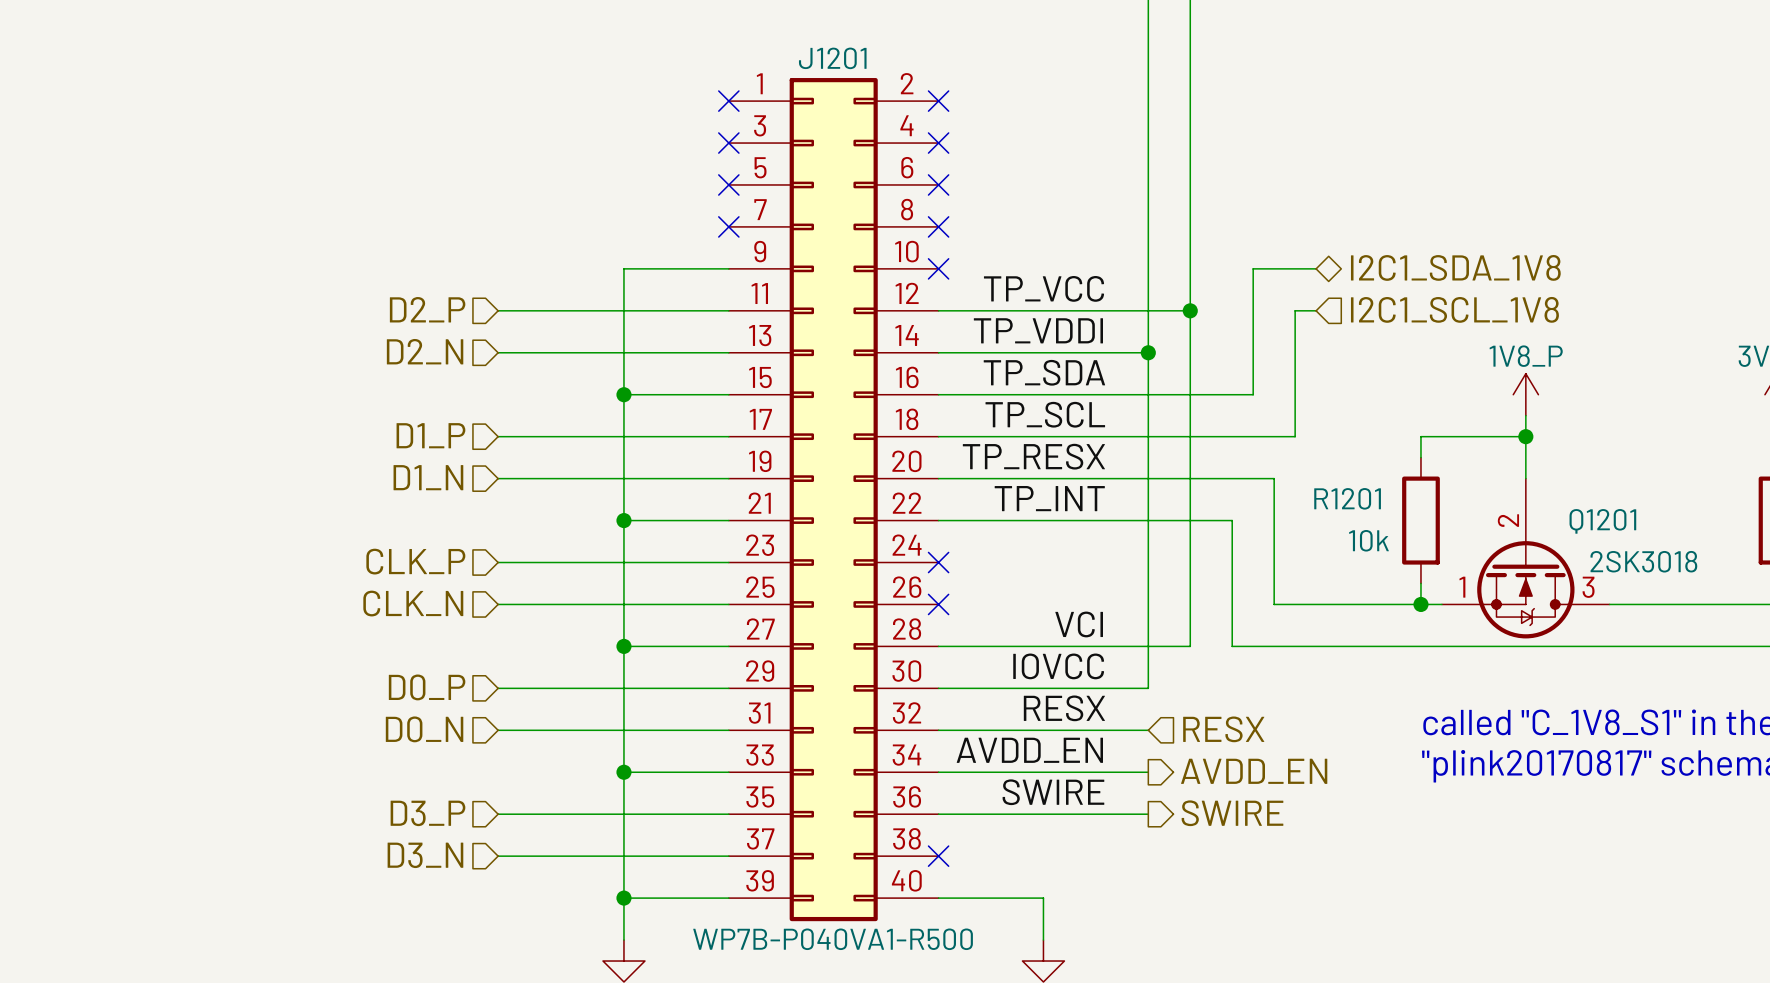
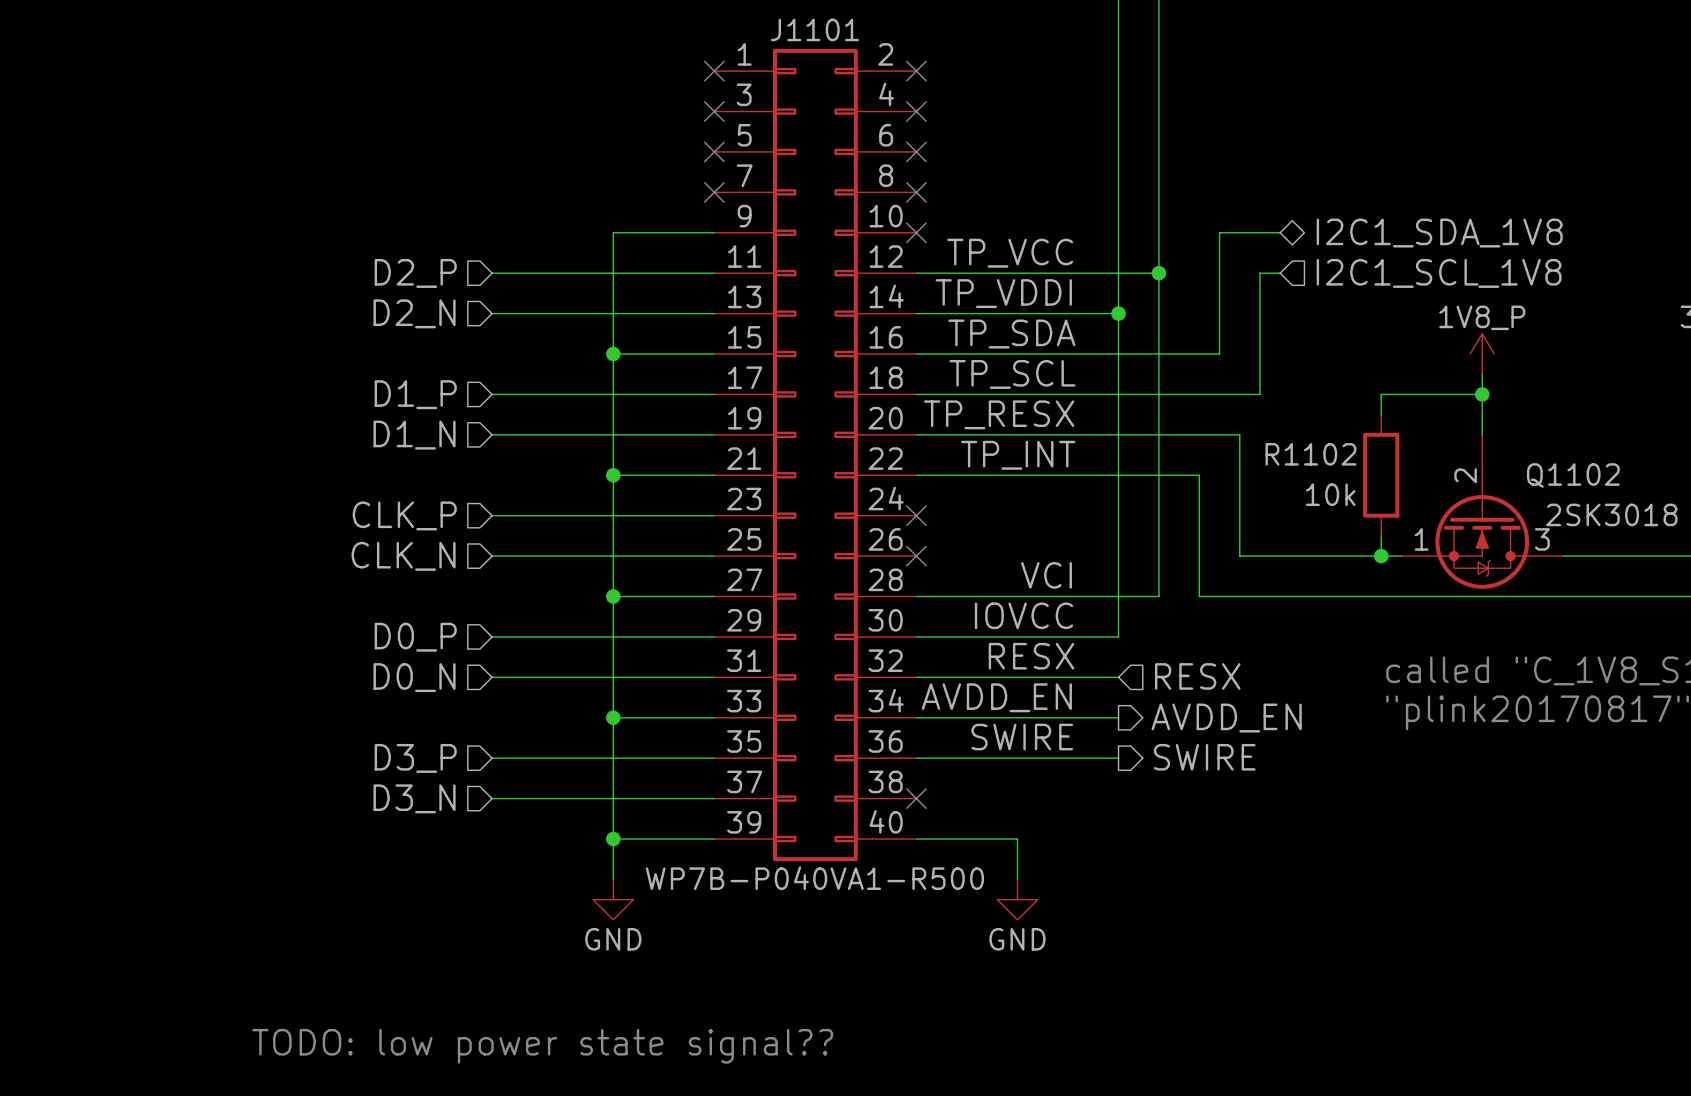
J1201 name: J1201 (832, 58) -> J1101 (814, 29)
R1201 name: R1201 (1347, 498) -> R1102 (1310, 454)
Q1201 name: Q1201 (1602, 521) -> Q1102 (1573, 475)

